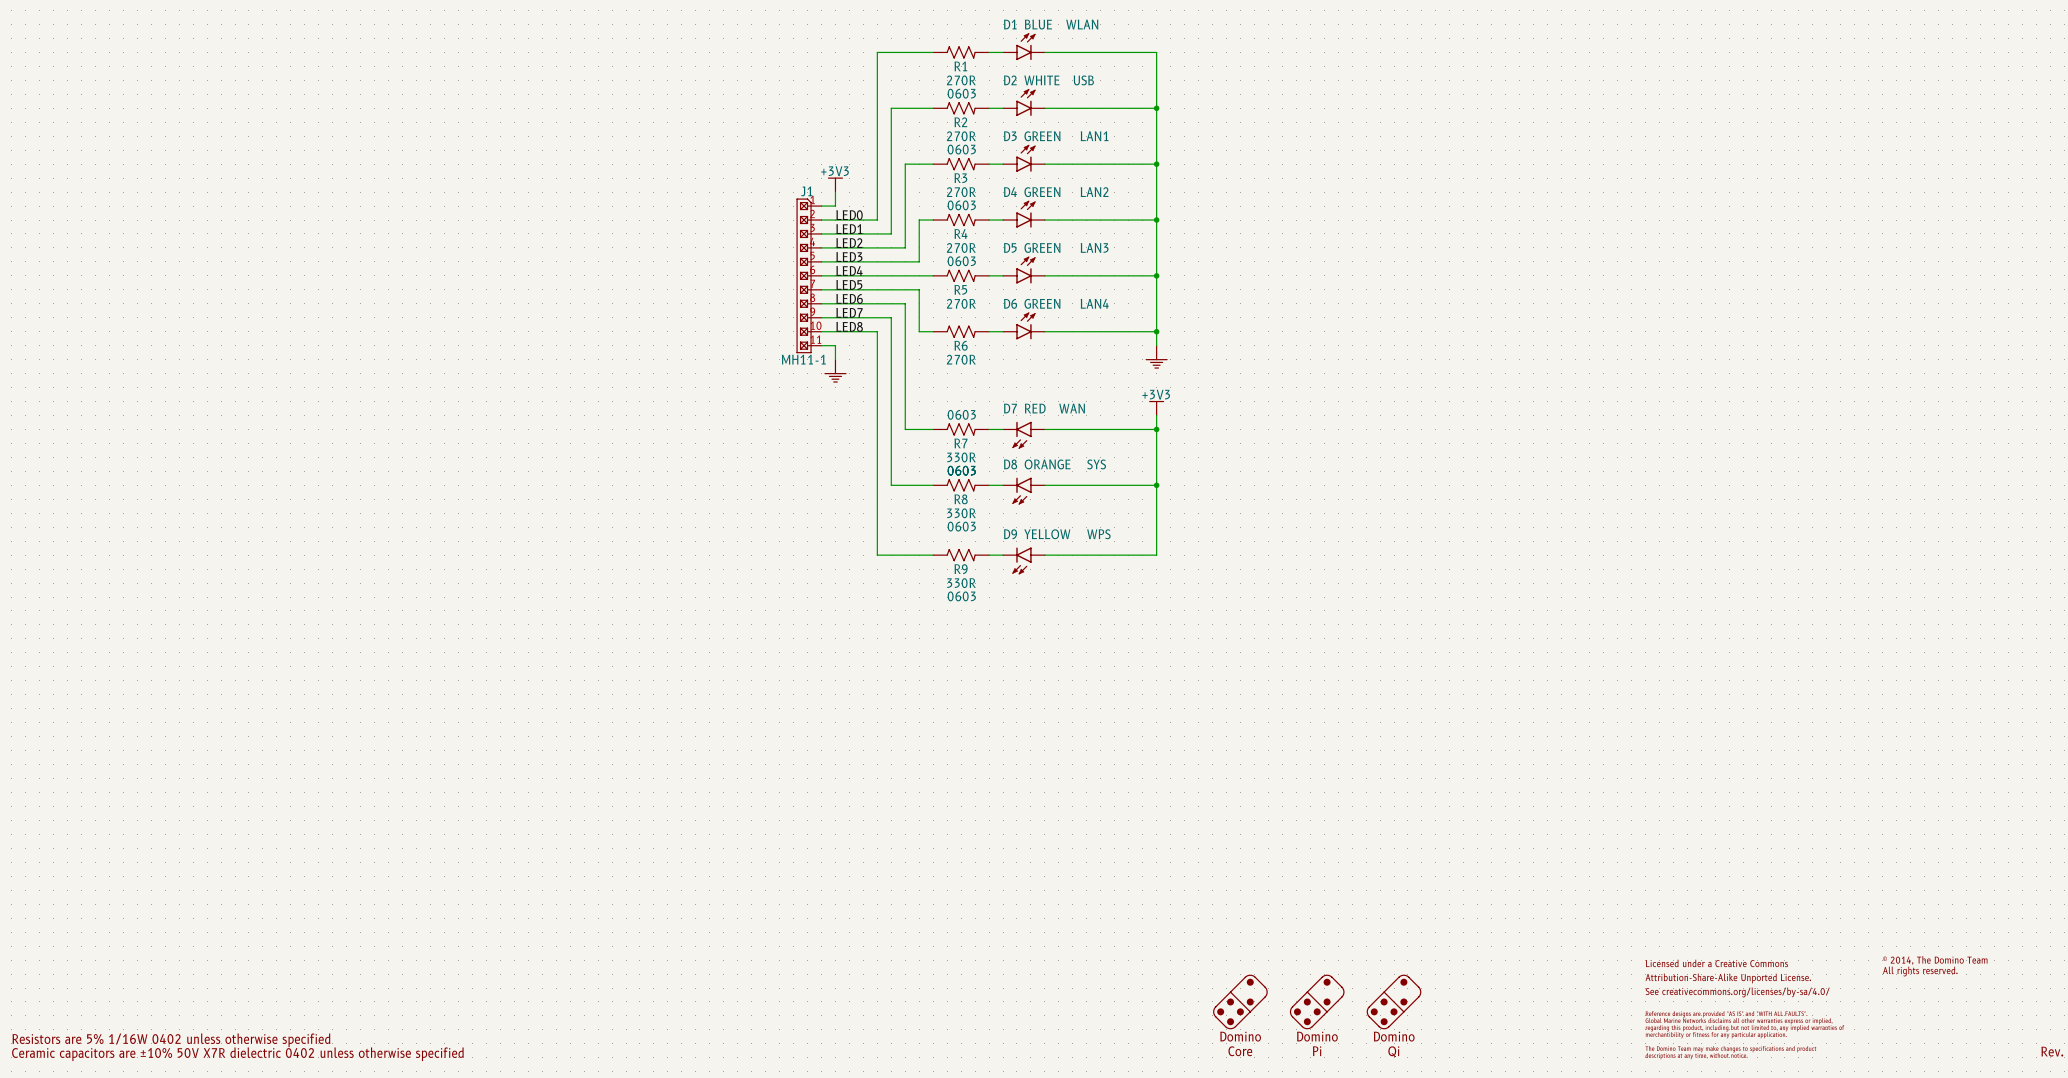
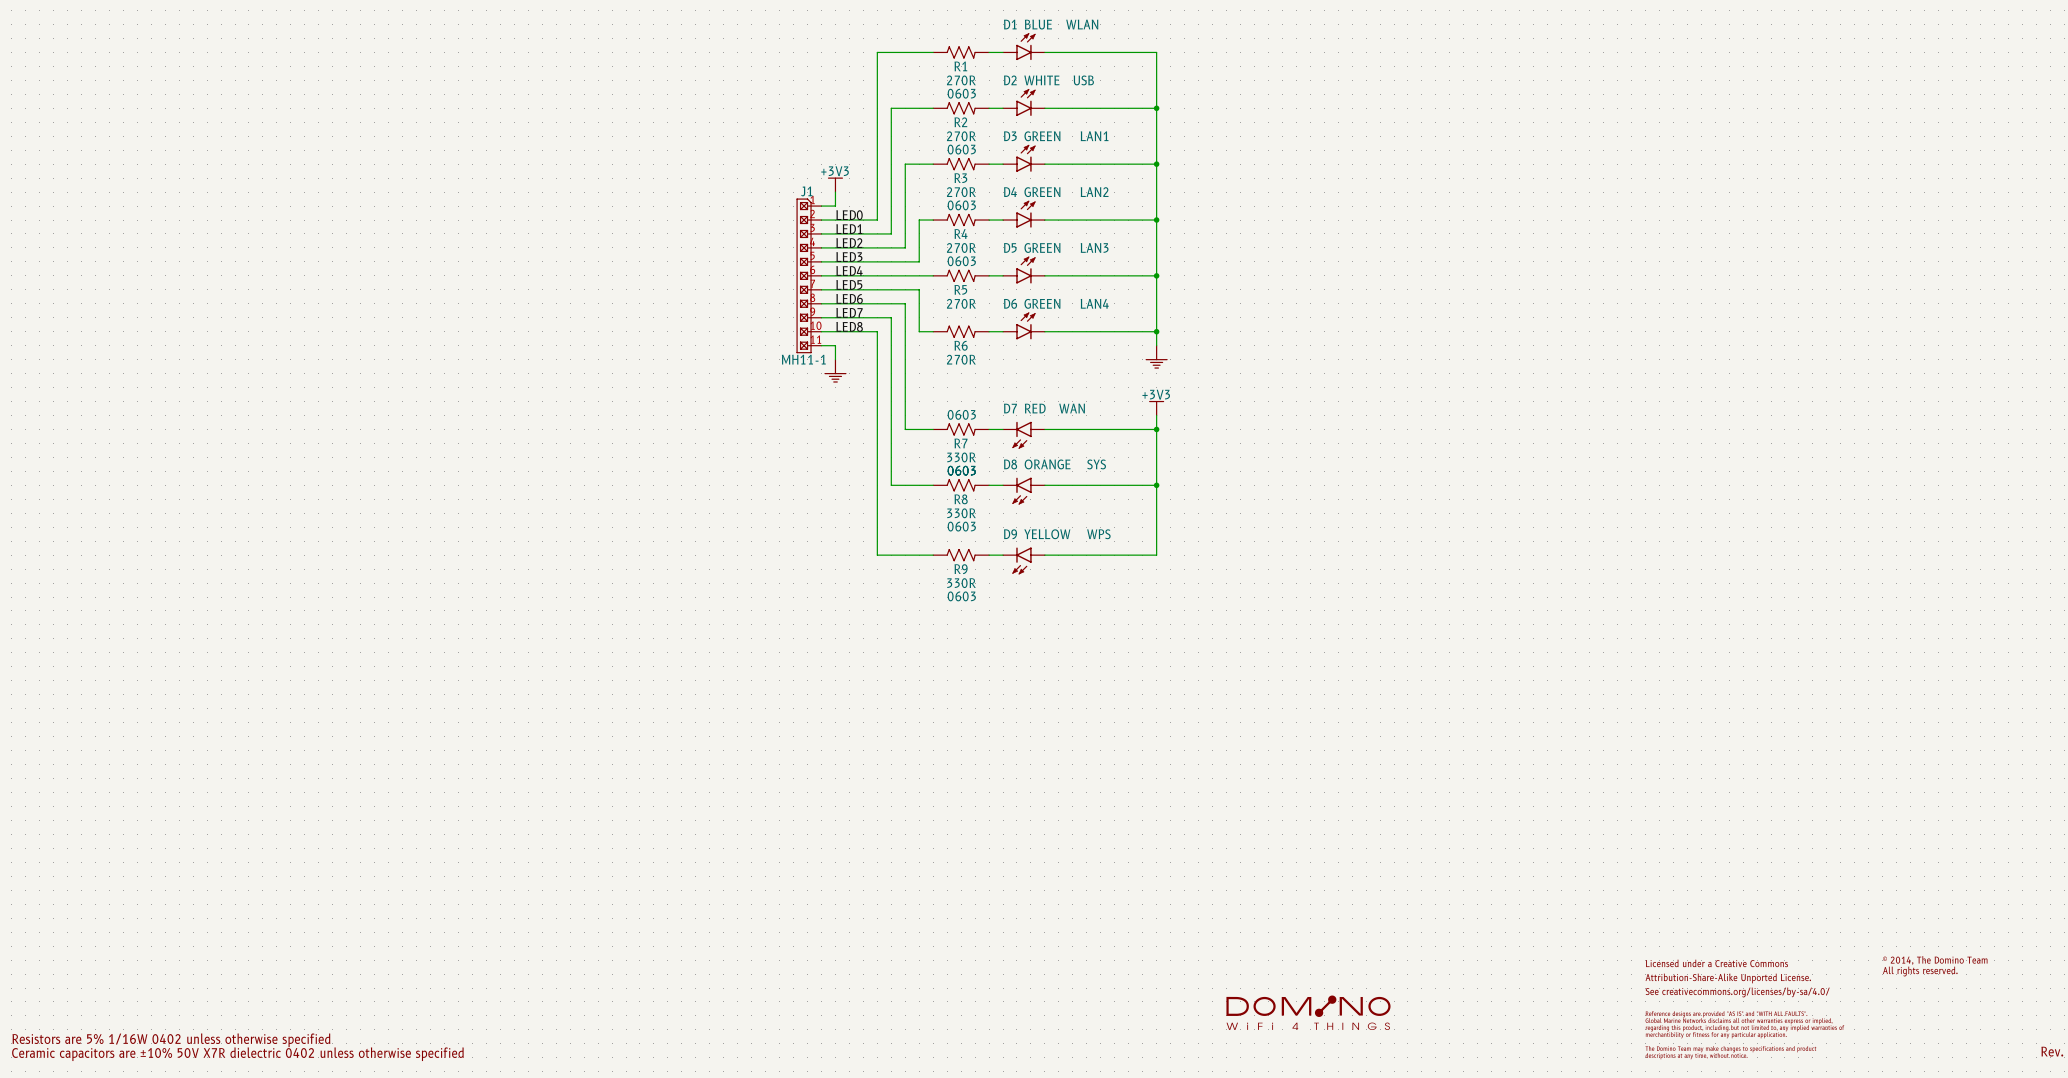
line: (1245, 977) (1213, 1010) (1215, 1016) (1228, 1028) (1235, 1026) (1266, 993) (1265, 987) (1254, 976) (1250, 975) (1245, 977) -> none
drawing: [1246, 978, 1254, 986] -> none
drawing: [1323, 978, 1331, 986] -> none
drawing: [1400, 978, 1408, 986] -> none
line: (1230, 992) (1250, 1011) -> none
line: (1307, 992) (1327, 1011) -> none
line: (1384, 992) (1403, 1011) -> none
drawing: [1217, 998, 1254, 1026] -> none
drawing: [1293, 998, 1331, 1026] -> none
drawing: [1370, 998, 1408, 1026] -> none
line: (1327, 1011) (1342, 996) (1343, 992) (1342, 987) (1332, 977) (1327, 975) (1322, 977) (1292, 1006) (1290, 1011) (1291, 1016) (1302, 1026) (1307, 1028) (1311, 1027) (1327, 1011) -> none
line: (1403, 1011) (1419, 996) (1420, 992) (1419, 987) (1408, 977) (1403, 975) (1398, 977) (1369, 1006) (1367, 1011) (1368, 1016) (1379, 1026) (1384, 1028) (1388, 1027) (1403, 1011) -> none
part: none -> (1308, 1012)
text: Domino (1240, 1036) -> none
text: Domino (1317, 1036) -> none
text: Domino (1394, 1036) -> none
text: Core (1240, 1051) -> none
text: Pi (1317, 1051) -> none
text: Qi (1393, 1051) -> none

